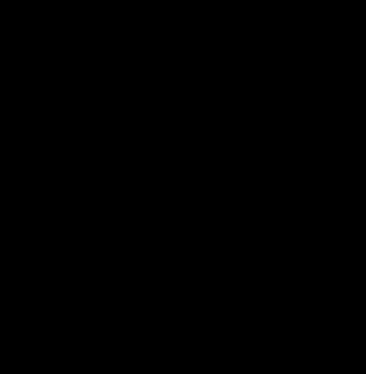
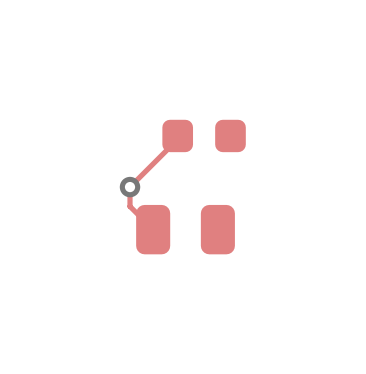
top track: none -> (177, 135) (177, 139) (130, 187) (130, 206) (153, 229)
part: none -> (204, 135)
via: none -> (130, 187)
part: none -> (185, 229)

